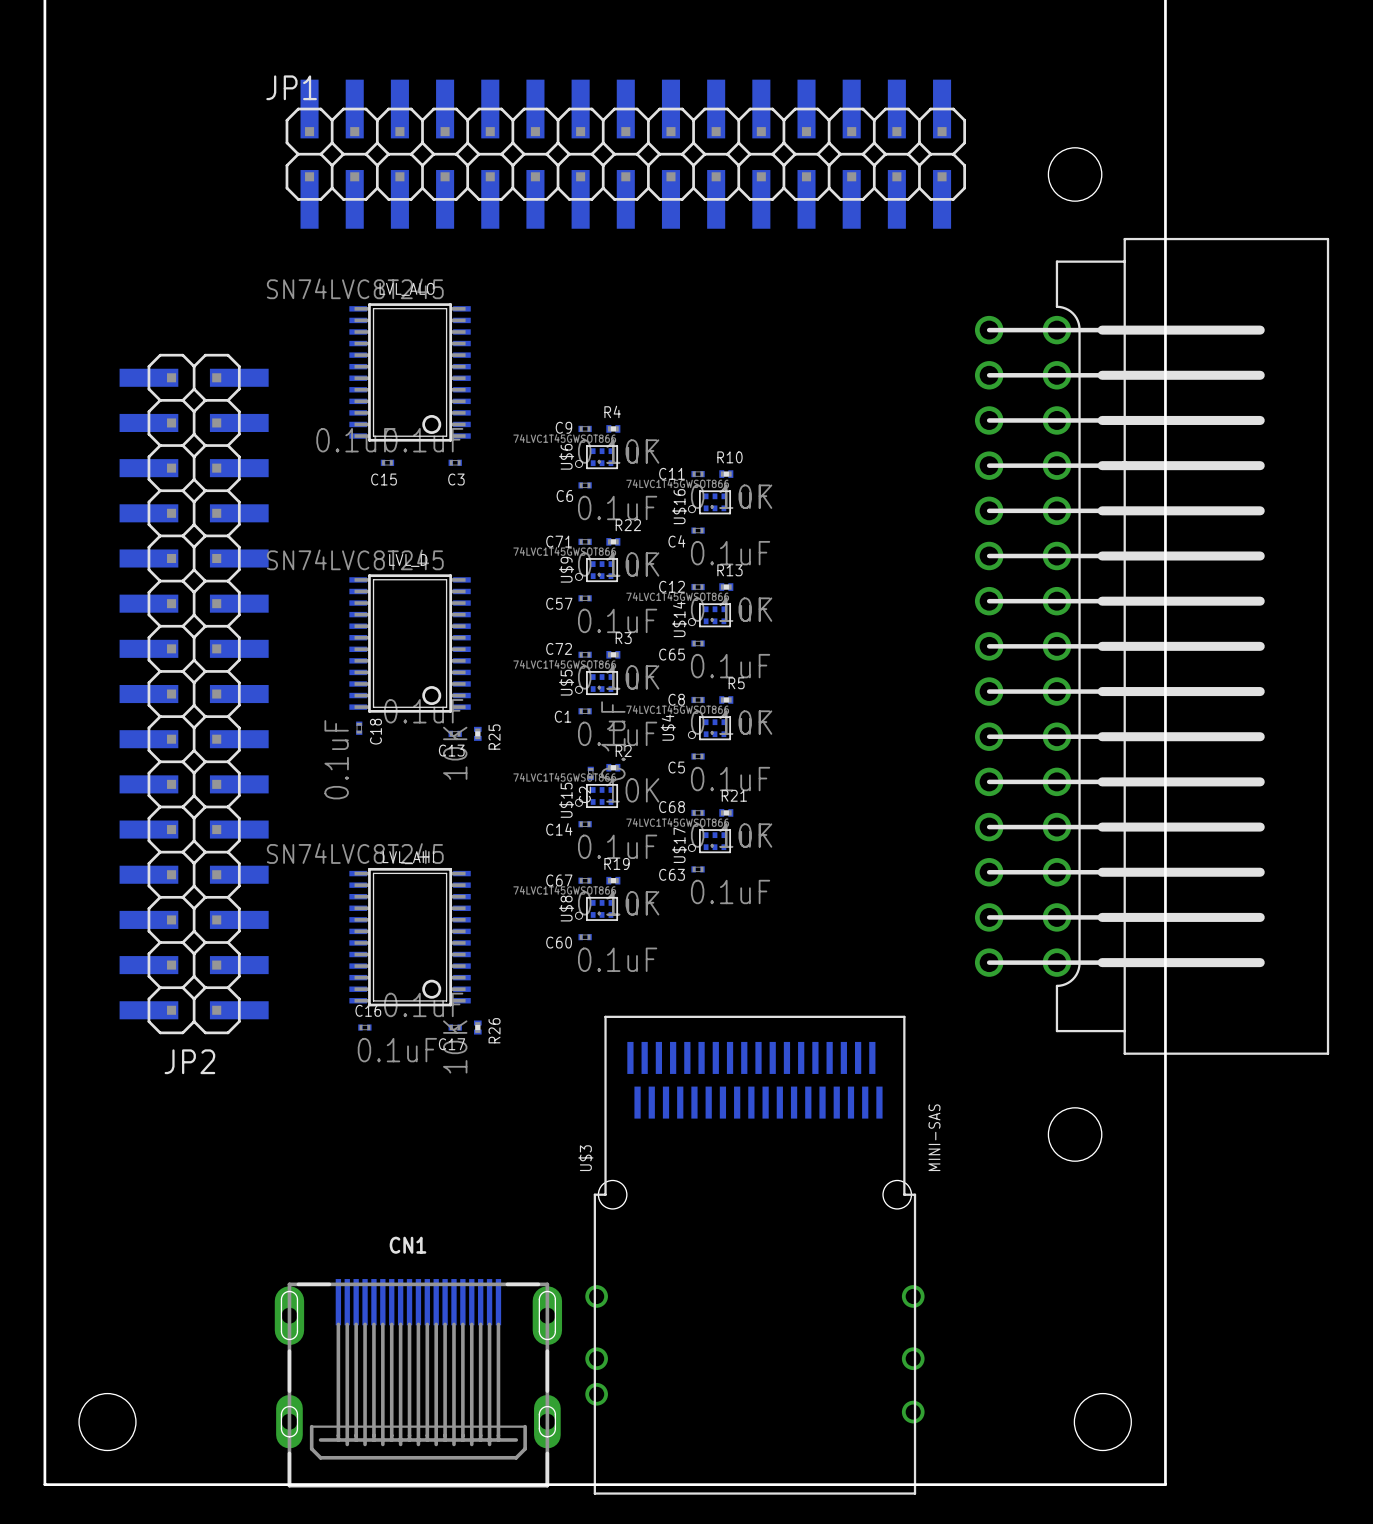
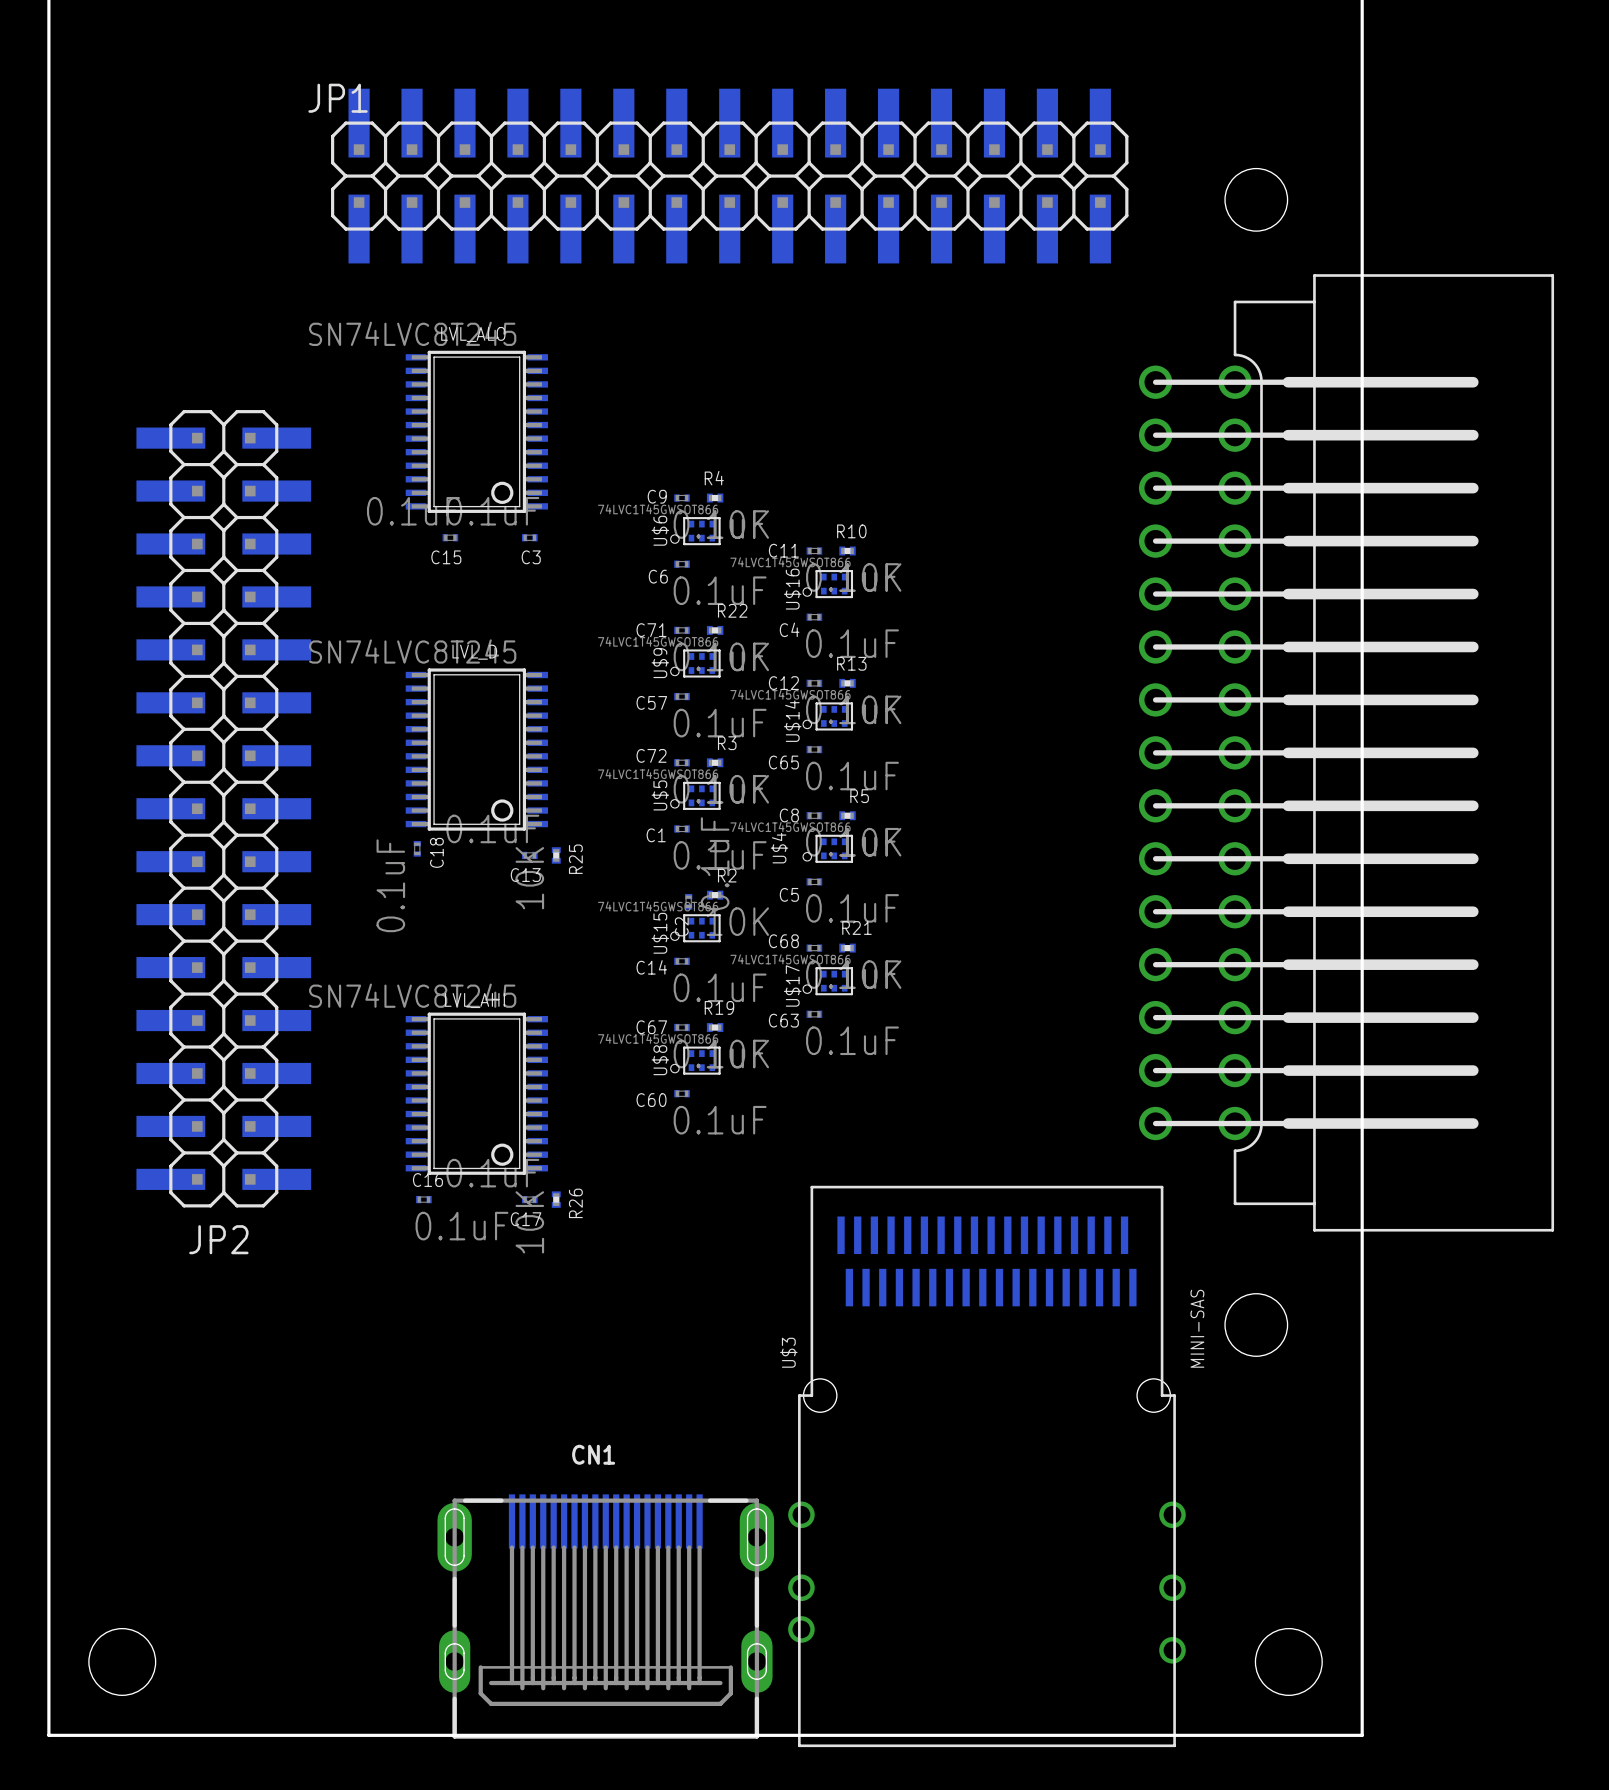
U$3 position: (754, 1255) -> (986, 1466)
CN1 position: (418, 1383) -> (605, 1616)

